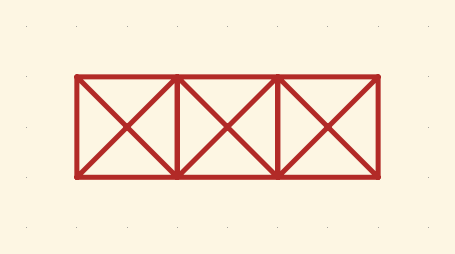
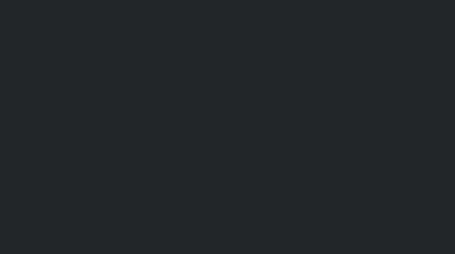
part: (127, 127) -> none
part: (227, 127) -> none
part: (327, 127) -> none

